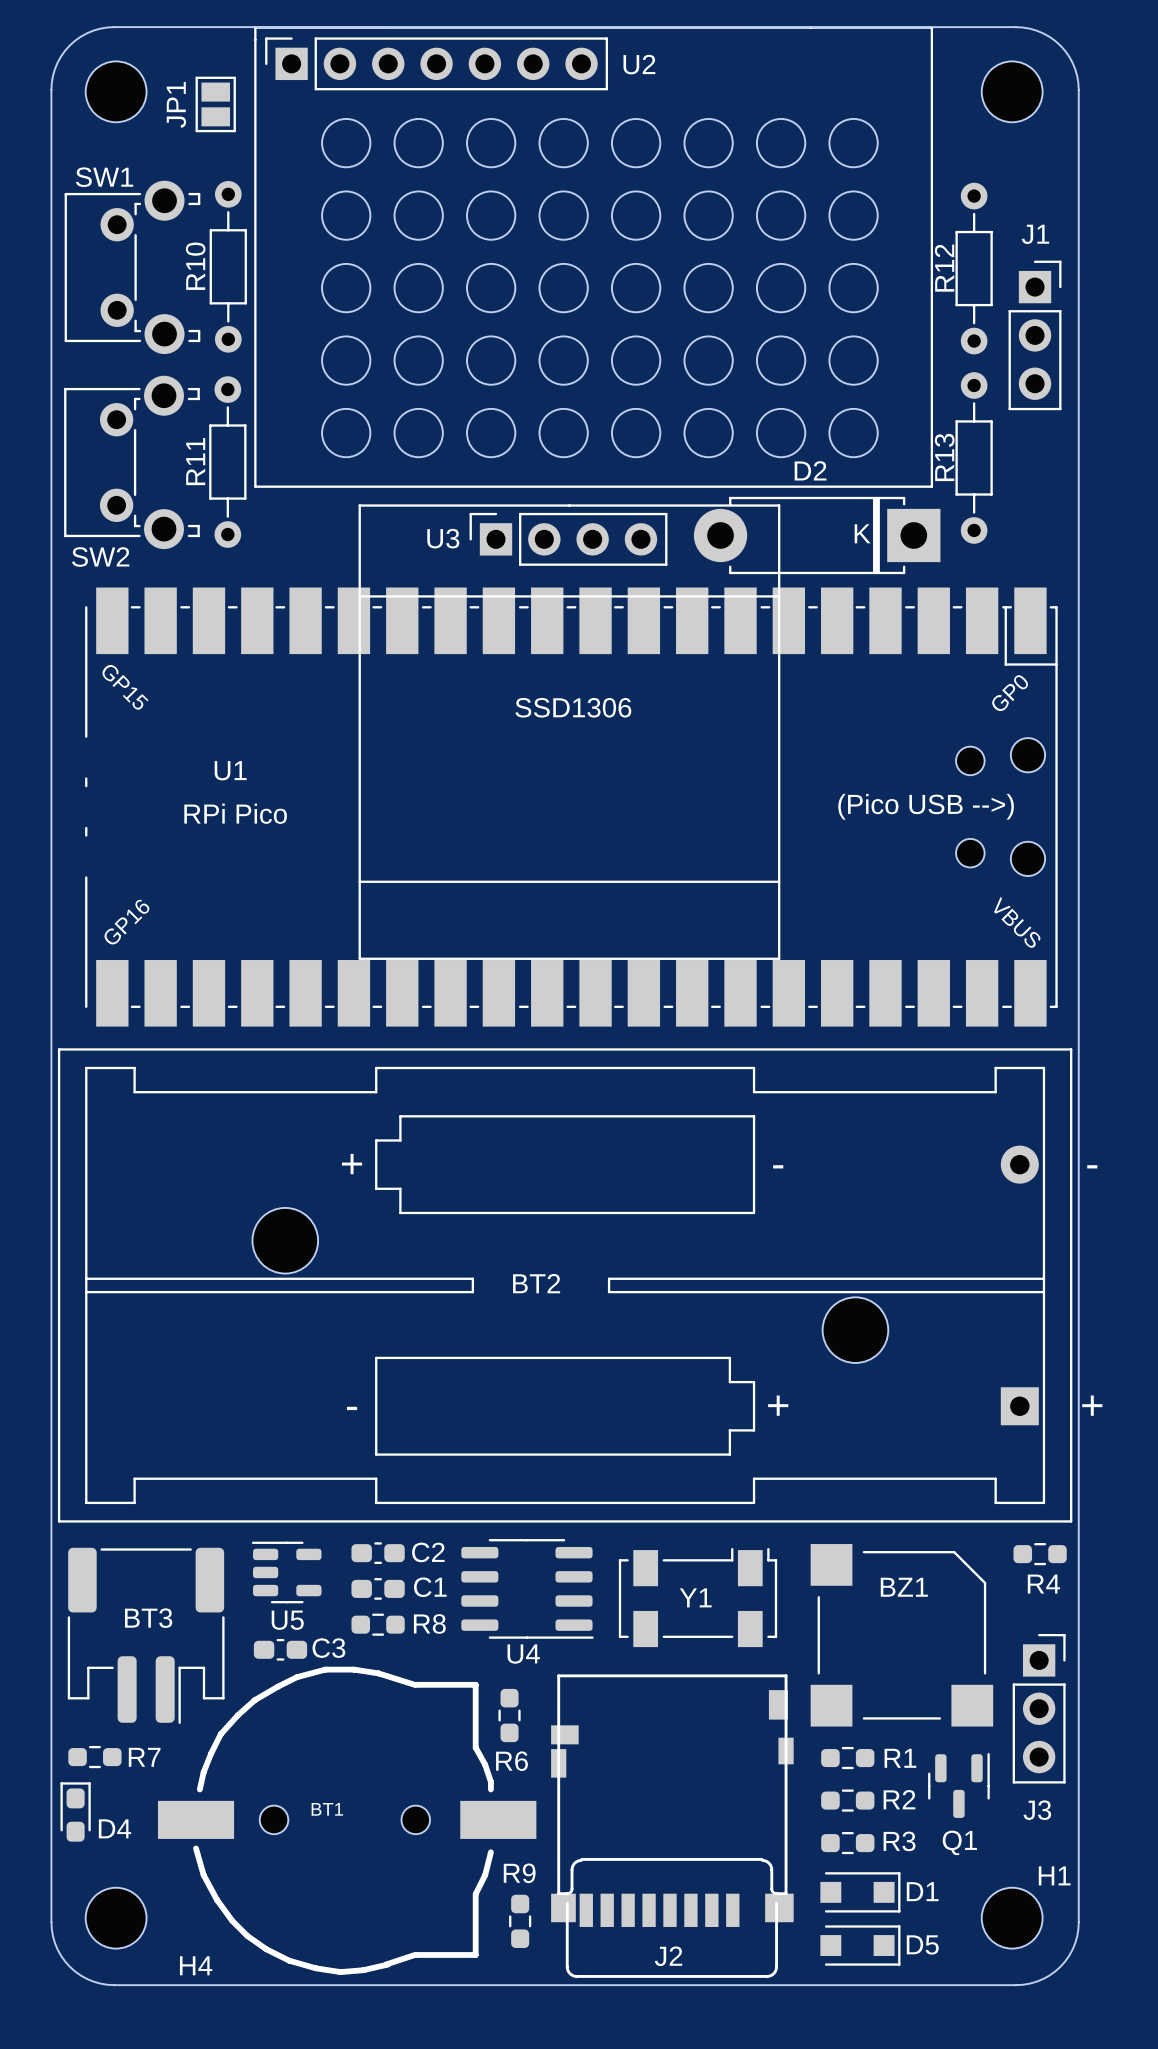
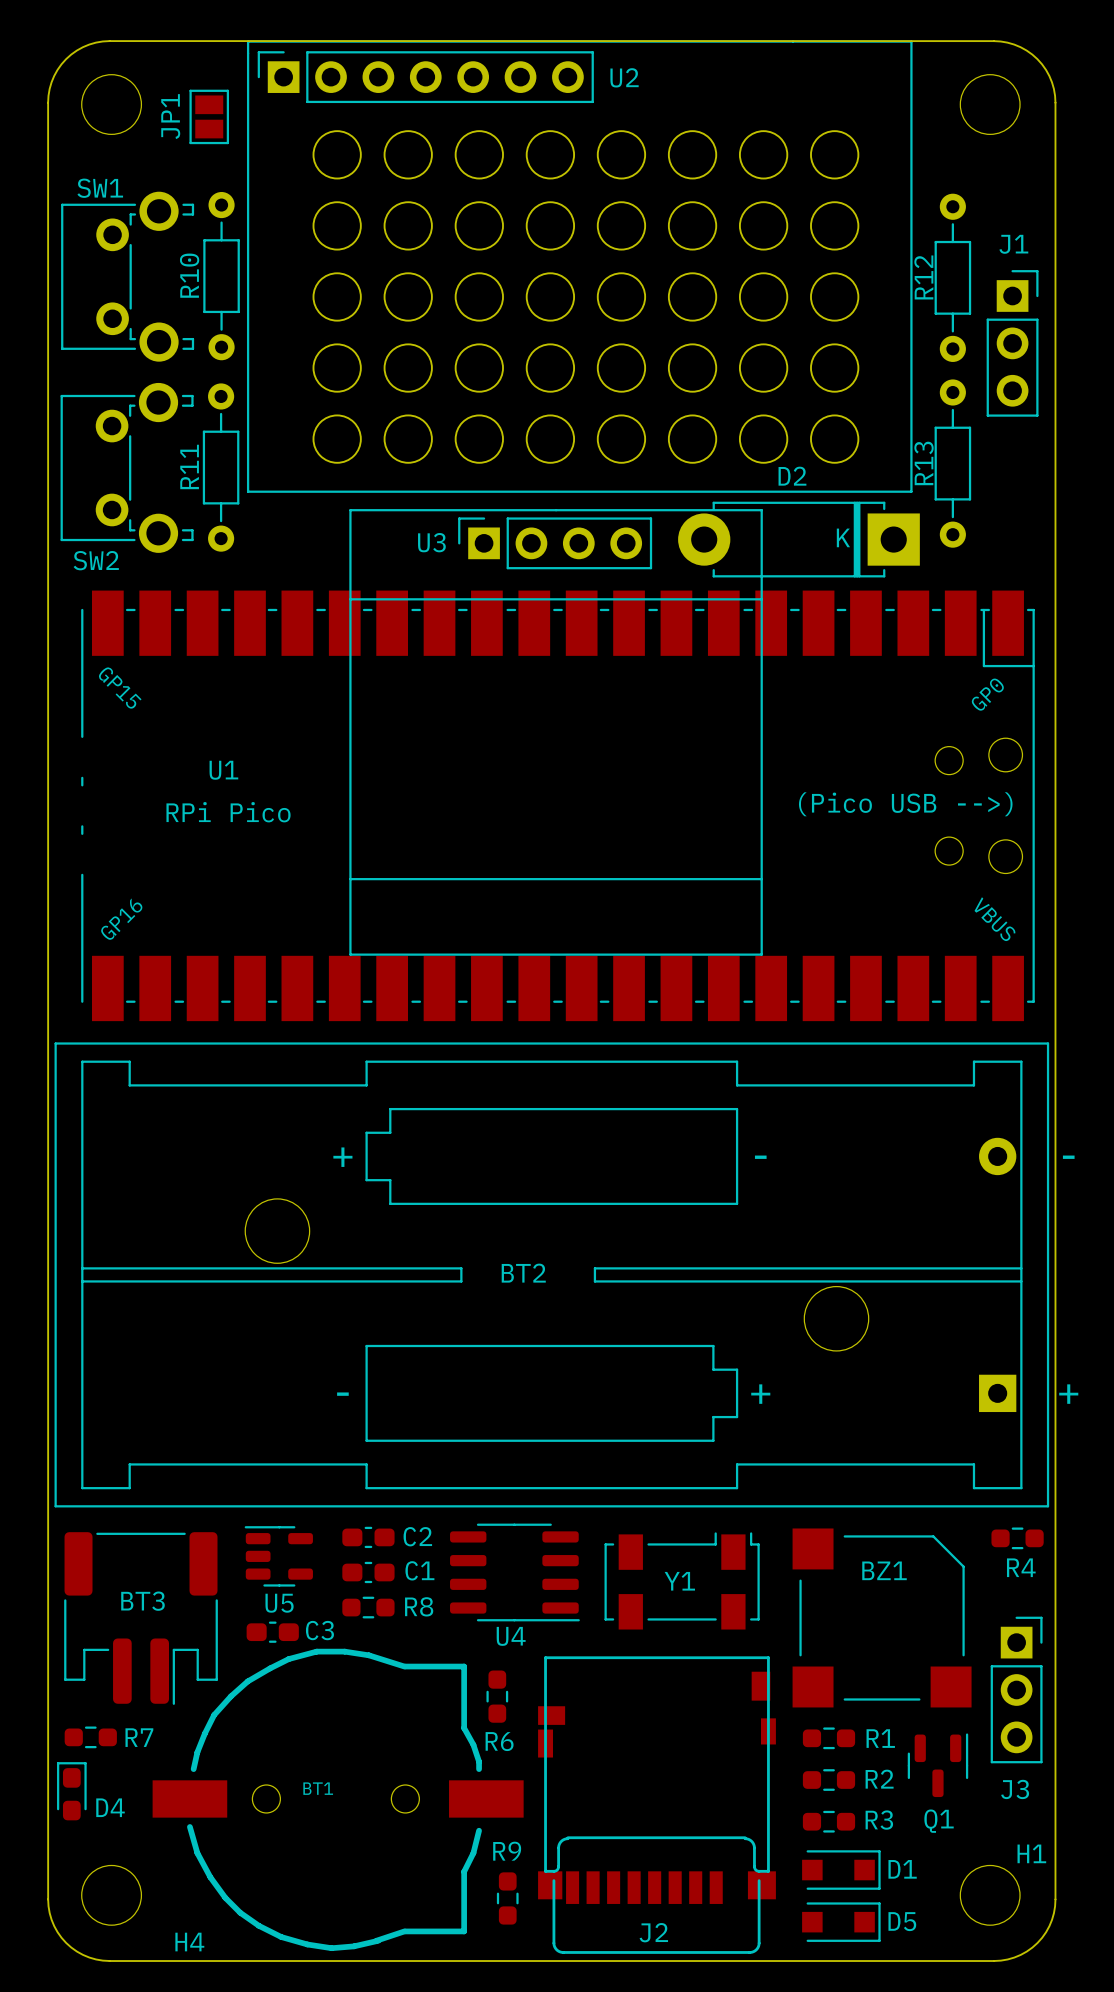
text: SSD1306 (573, 707) -> none

